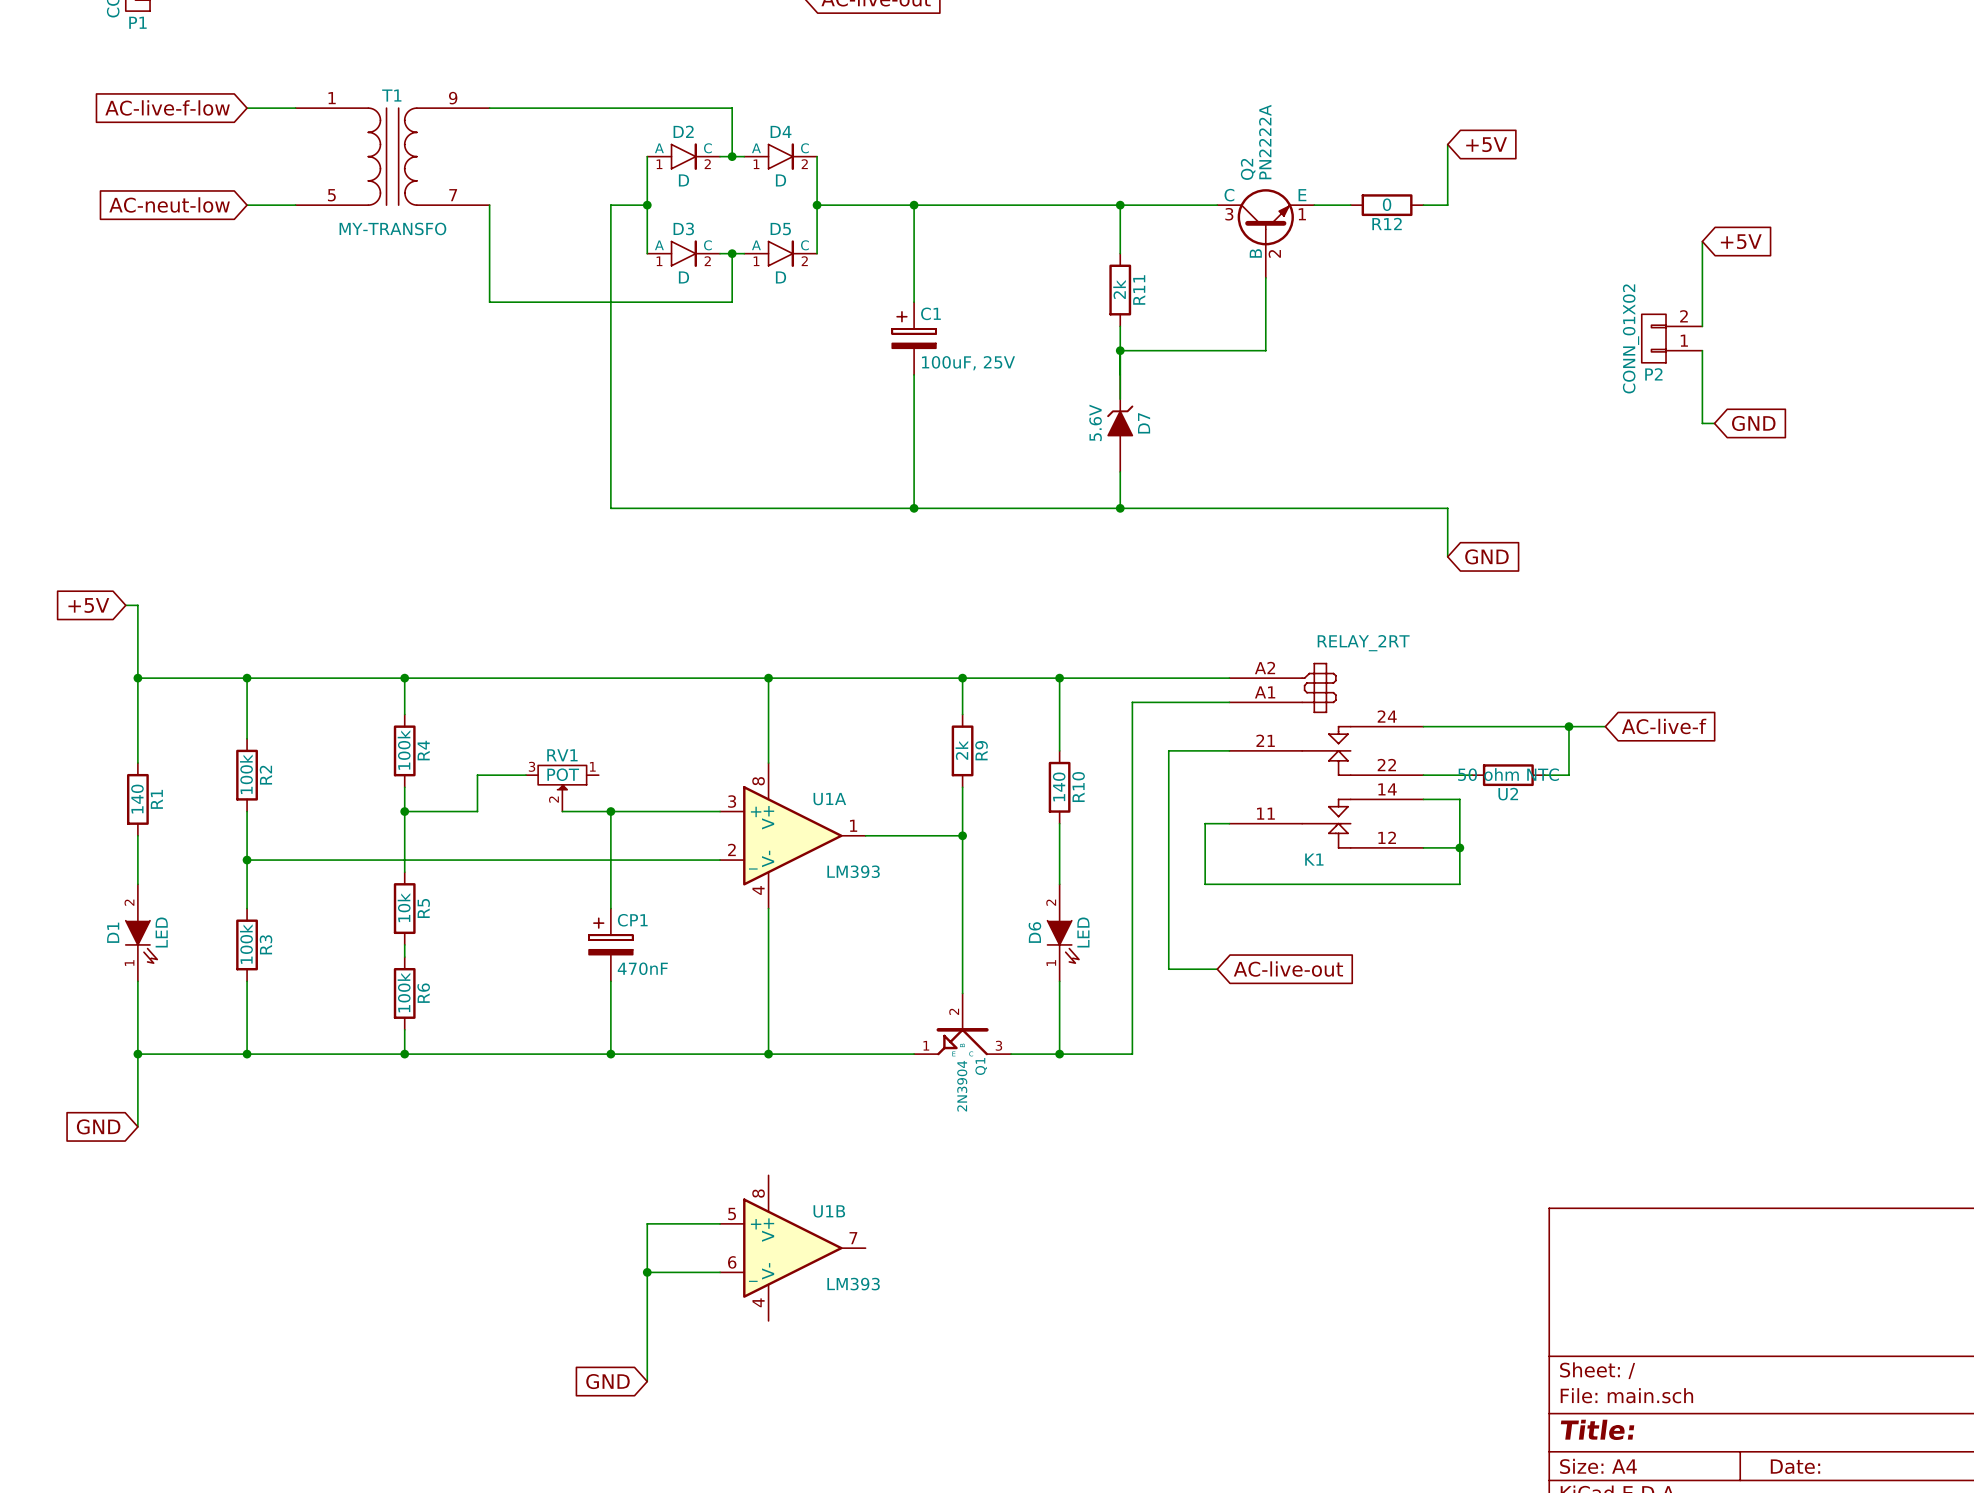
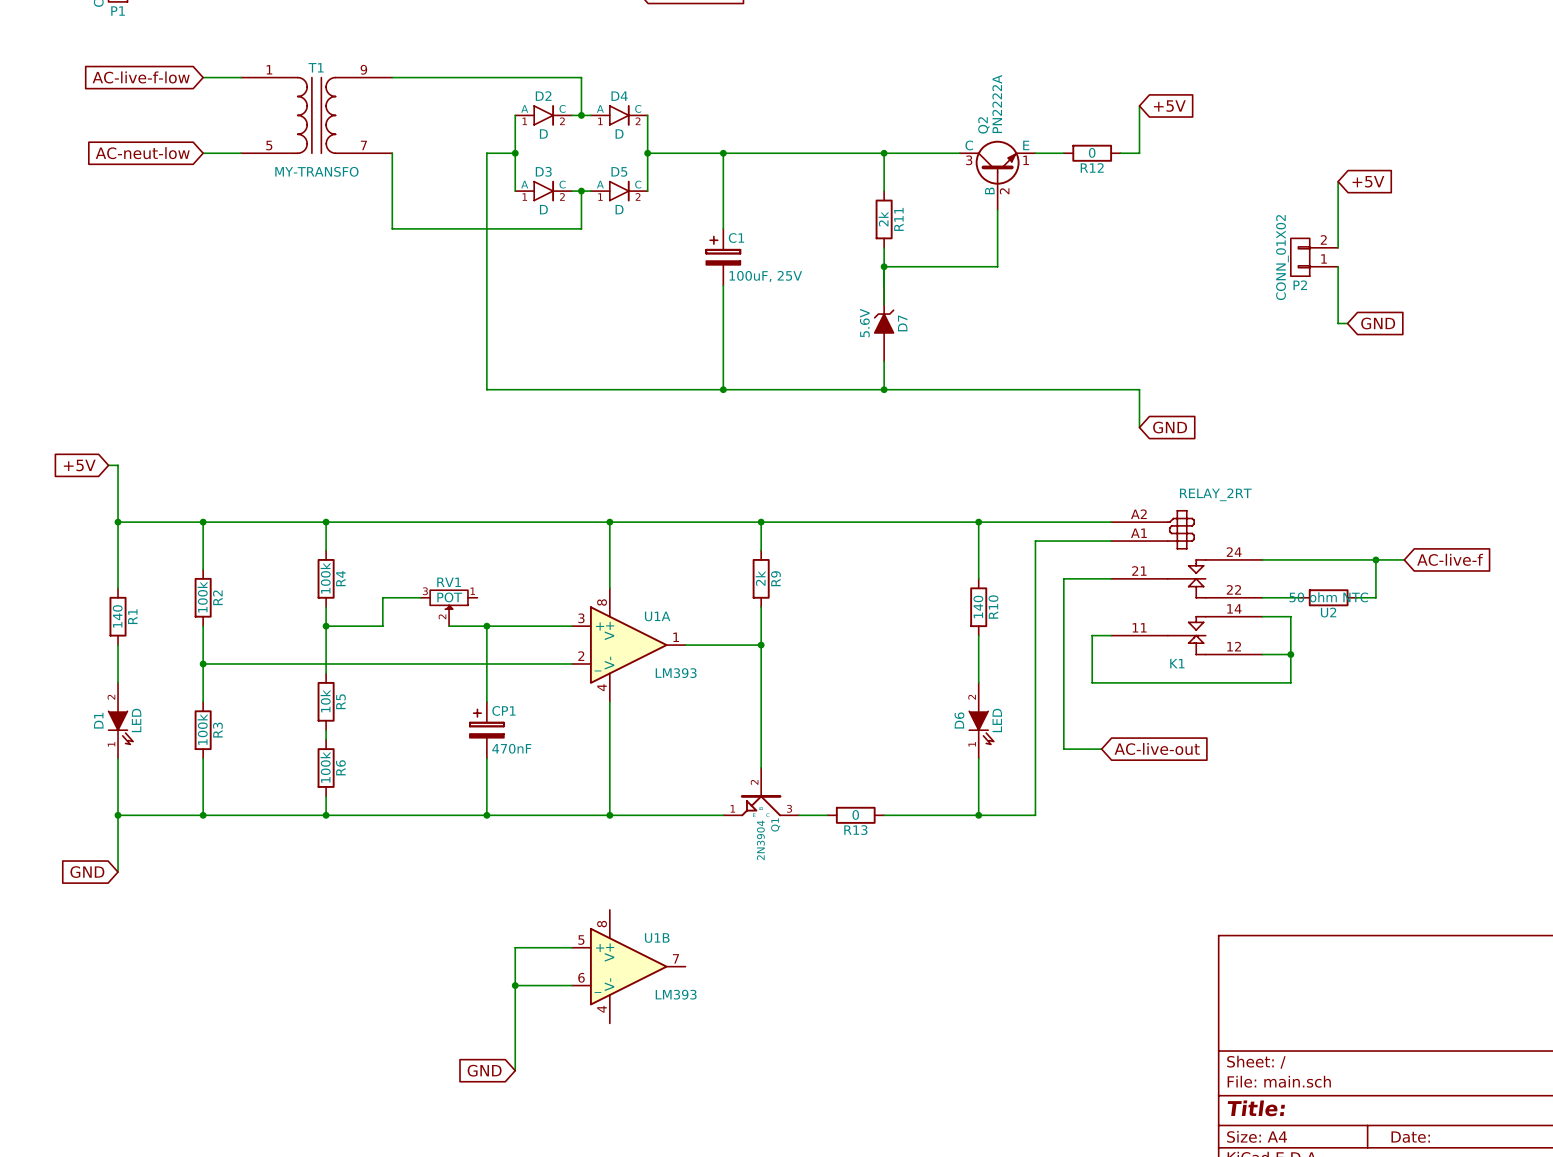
wire: (1059, 678) (1059, 750) -> (978, 522) (978, 578)
junction: (1059, 678) -> none
wire: none -> (969, 522) (1111, 522)
junction: none -> (978, 522)
wire: (1229, 702) (1132, 702) (1132, 1054) -> (1111, 541) (1035, 541) (1035, 815) (893, 815)
wire: (1423, 726) (1605, 726) -> (1404, 559) (1262, 559)
wire: (1568, 726) (1568, 775) (1544, 775) -> (1375, 559) (1375, 597) (1357, 597)
junction: (1568, 726) -> none
global label position: AC-live-f (1664, 726) -> AC-live-f (1450, 559)
junction: none -> (1375, 559)
wire: (1229, 750) (1168, 750) (1168, 969) (1217, 969) -> (1111, 578) (1063, 578) (1063, 749) (1101, 749)
K1 position: (1326, 755) -> (1186, 582)
wire: (1423, 775) (1471, 775) -> (1262, 597) (1300, 597)
U2 position: (1508, 775) -> (1328, 597)
R10 position: (1059, 787) -> (978, 607)
wire: (1423, 799) (1459, 799) (1459, 884) -> (1262, 616) (1290, 616) (1290, 682) (1148, 682)
wire: (1059, 823) (1059, 884) -> (978, 635) (978, 682)
wire: (1229, 823) (1205, 823) (1205, 884) (1387, 884) -> (1111, 635) (1092, 635) (1092, 682)
wire: (1423, 847) (1459, 847) -> (1262, 654) (1290, 654)
junction: (1459, 847) -> none
junction: none -> (1290, 654)
D6 position: (1063, 932) -> (981, 720)
global label position: AC-live-out (1288, 969) -> AC-live-out (1157, 748)
wire: (1059, 981) (1059, 1054) -> (978, 758) (978, 815)
wire: (1047, 1054) (1120, 1054) -> none
junction: (1059, 1054) -> none
R13: none -> 0 (855, 815)
junction: none -> (978, 815)

